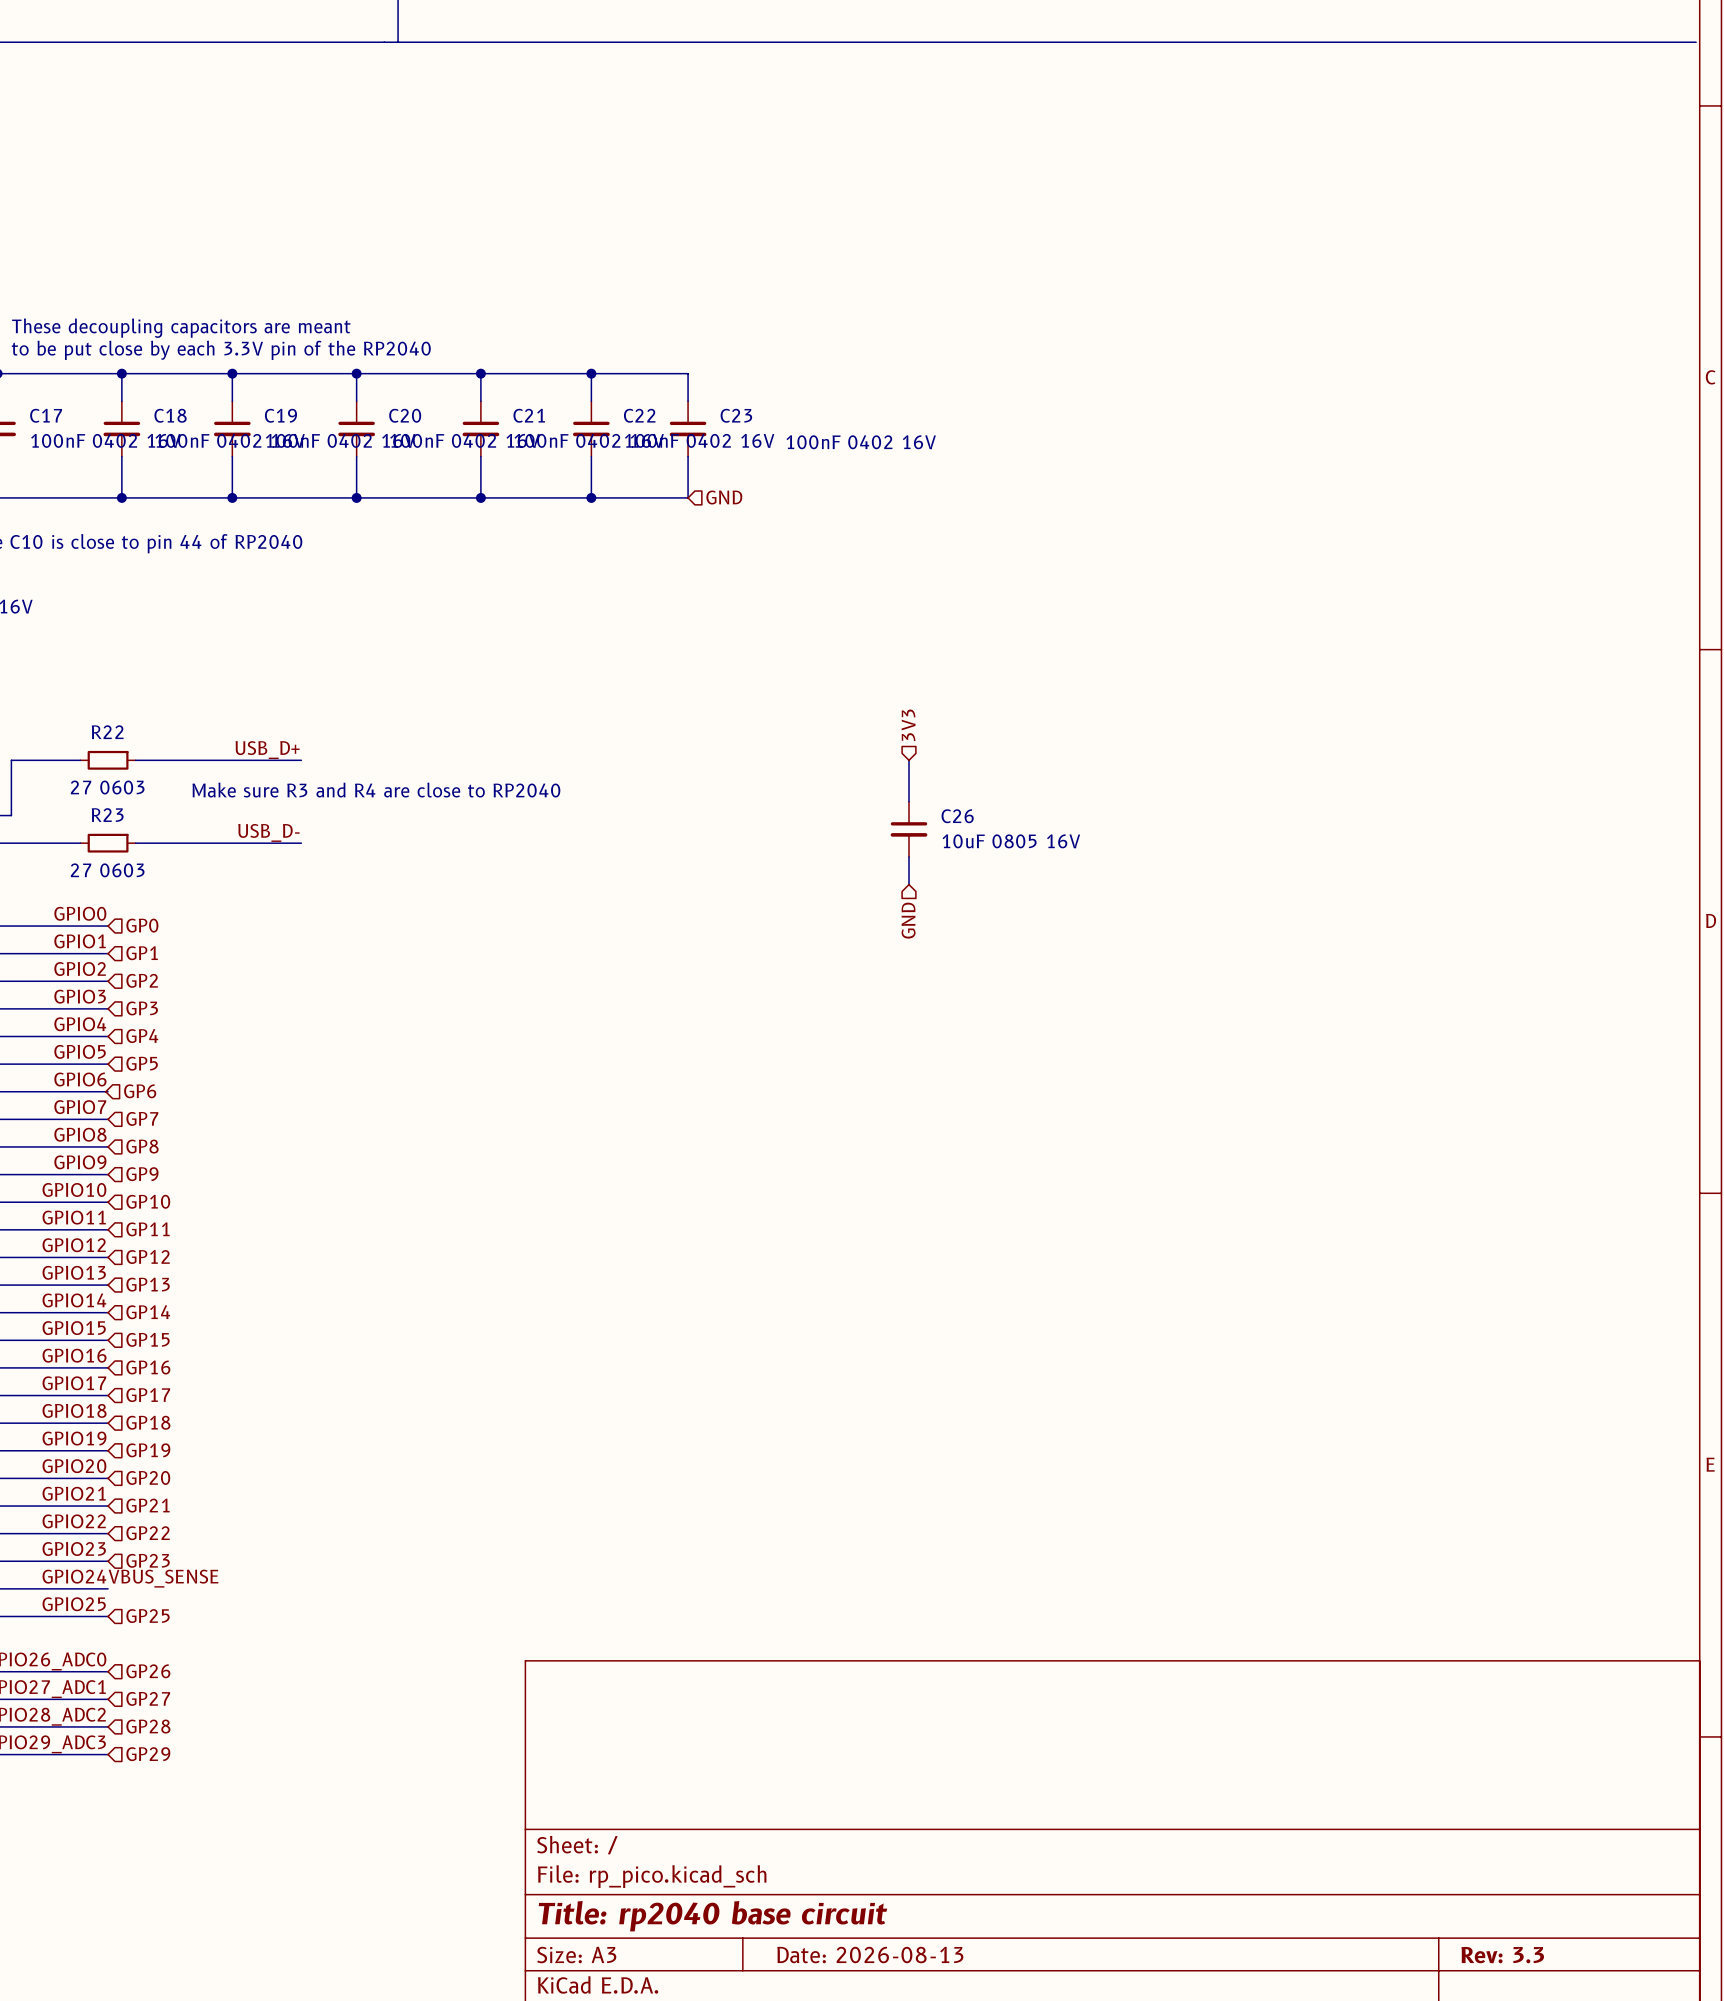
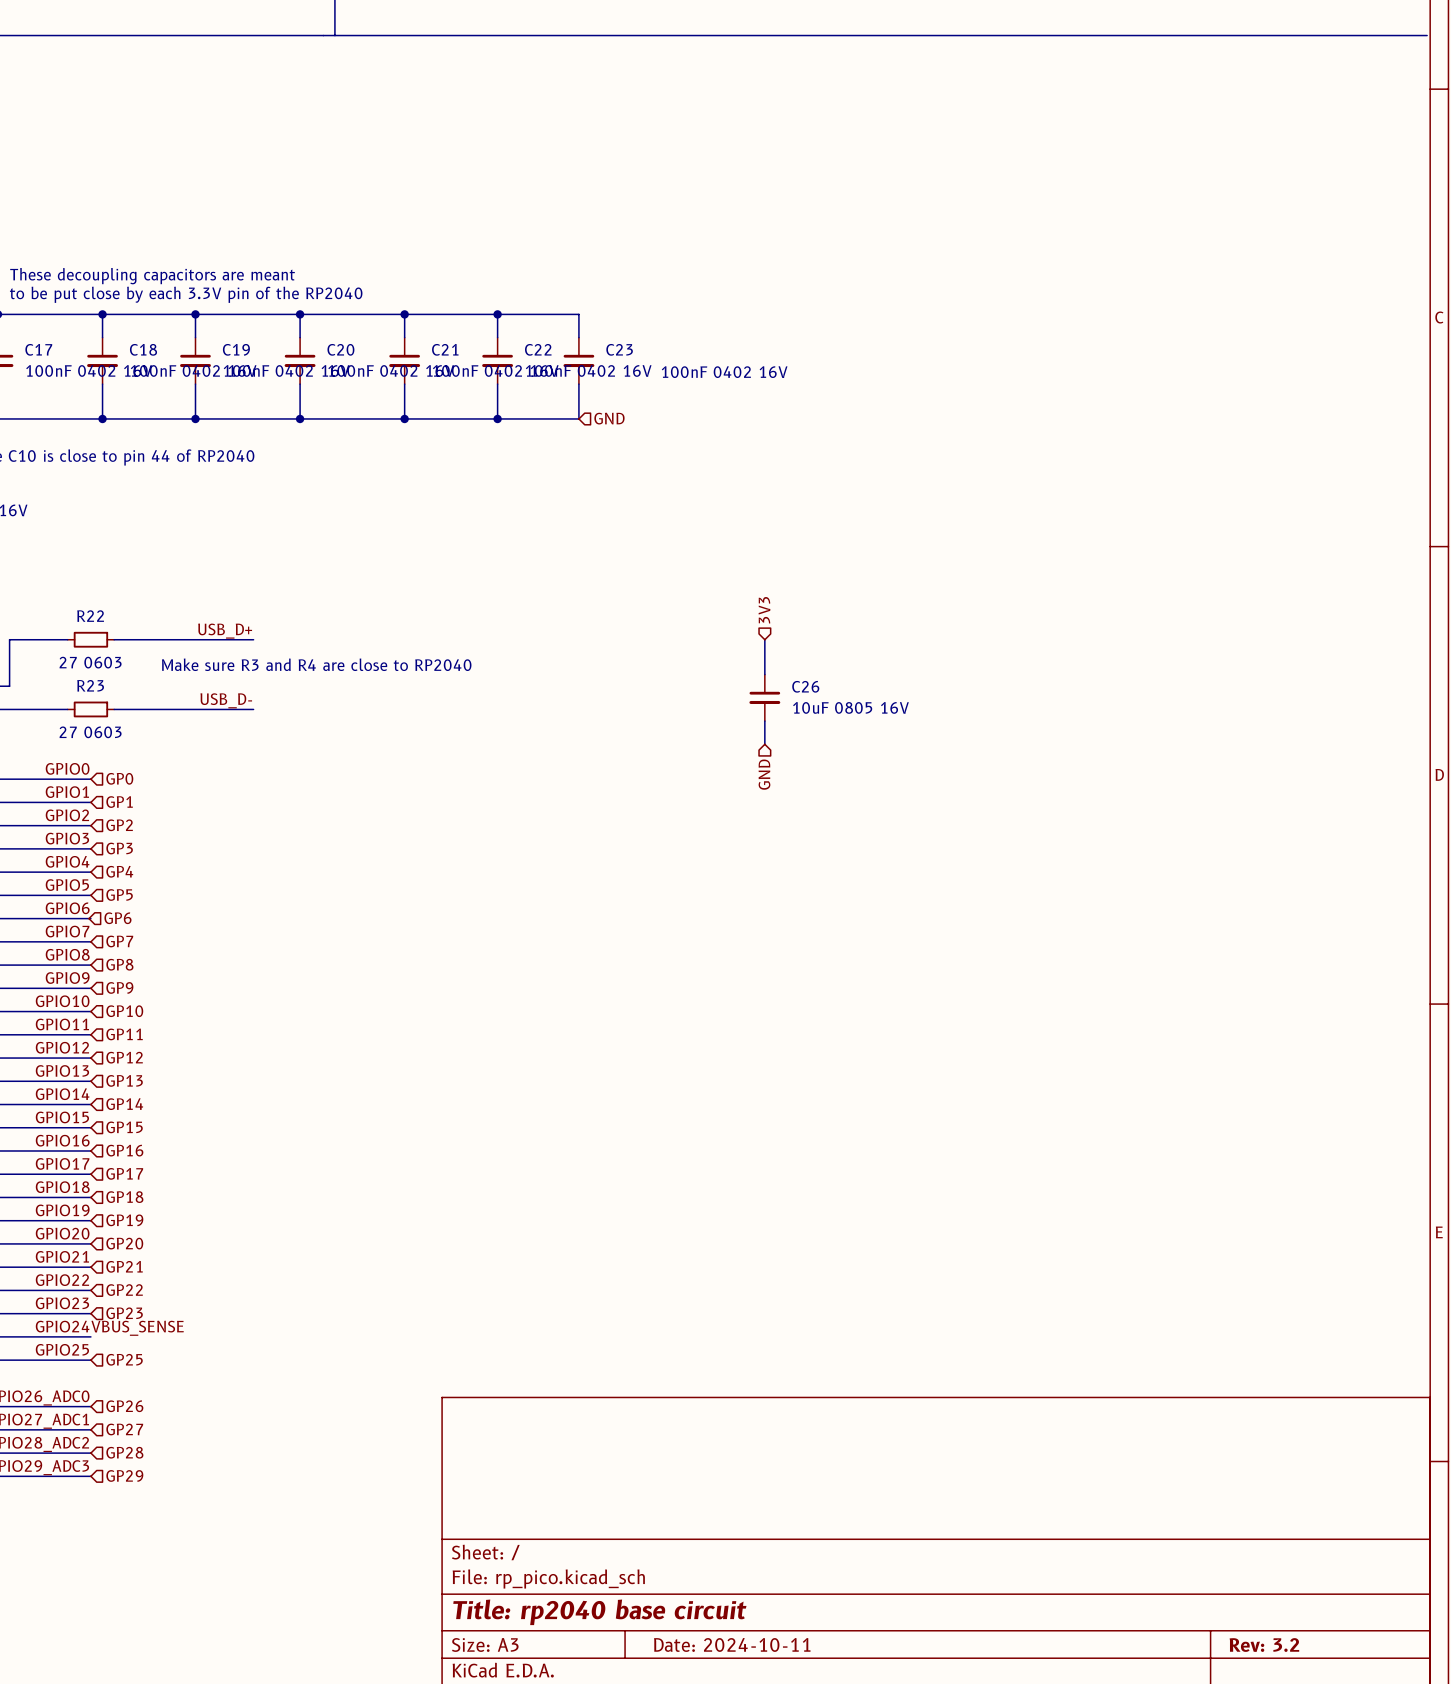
title block: Date: 2026-08-13 (870, 1955) -> Date: 2024-10-11 (732, 1644)
title block: Rev: 3.3 (1502, 1955) -> Rev: 3.2 (1264, 1645)

